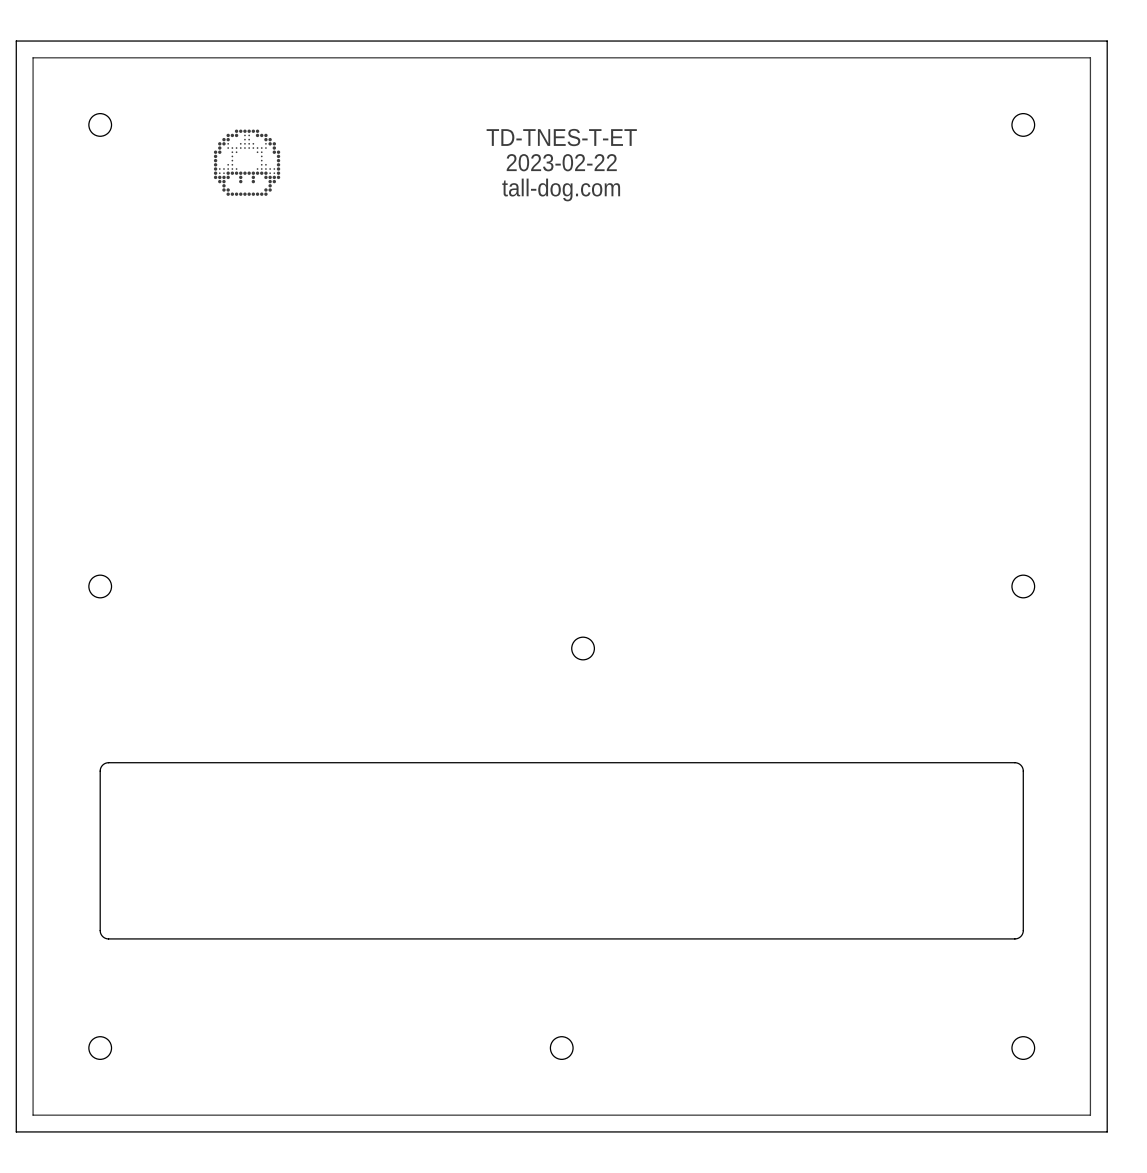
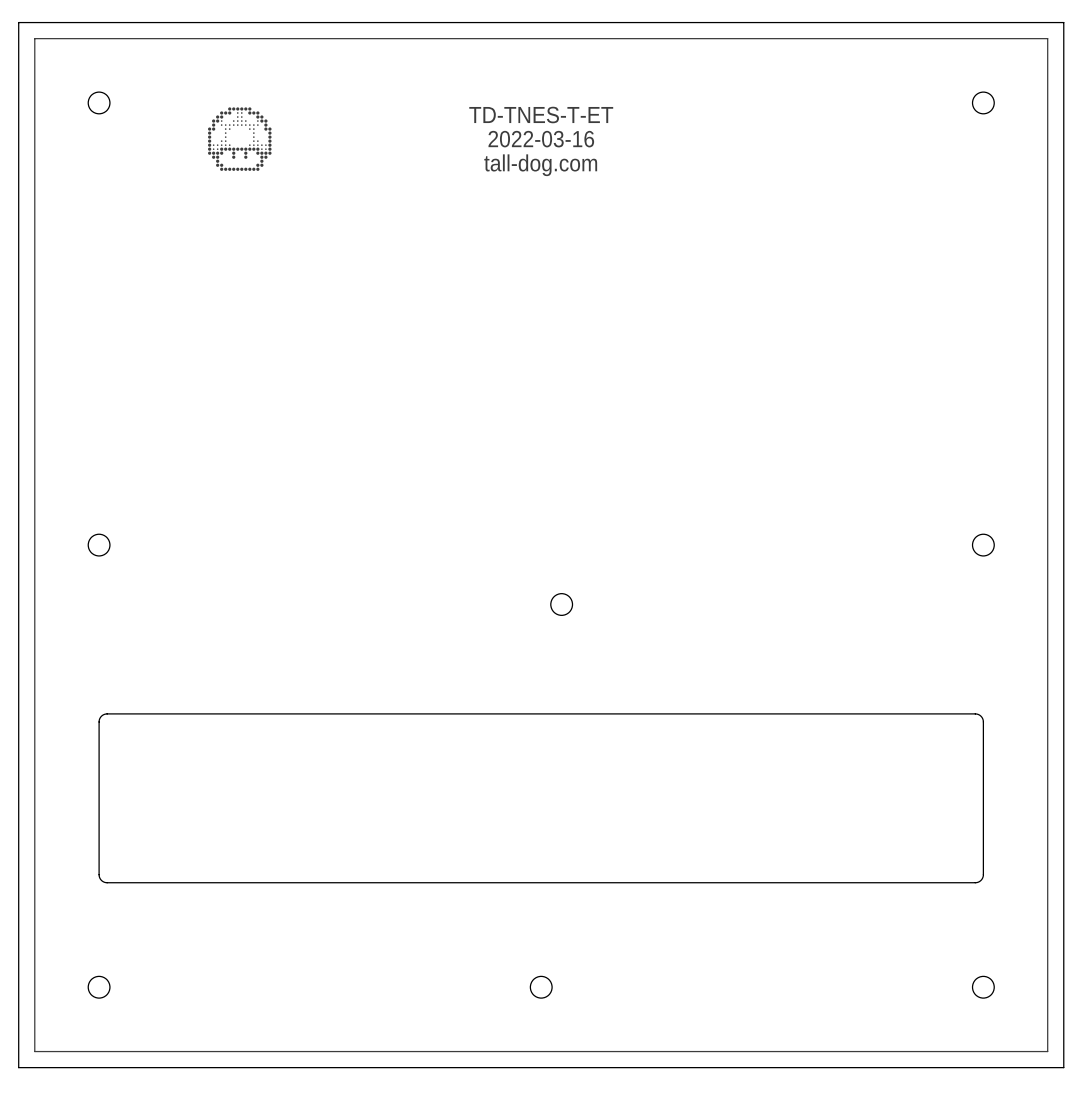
text: 2023-02-22 (561, 162) -> 2022-03-16 (541, 139)

